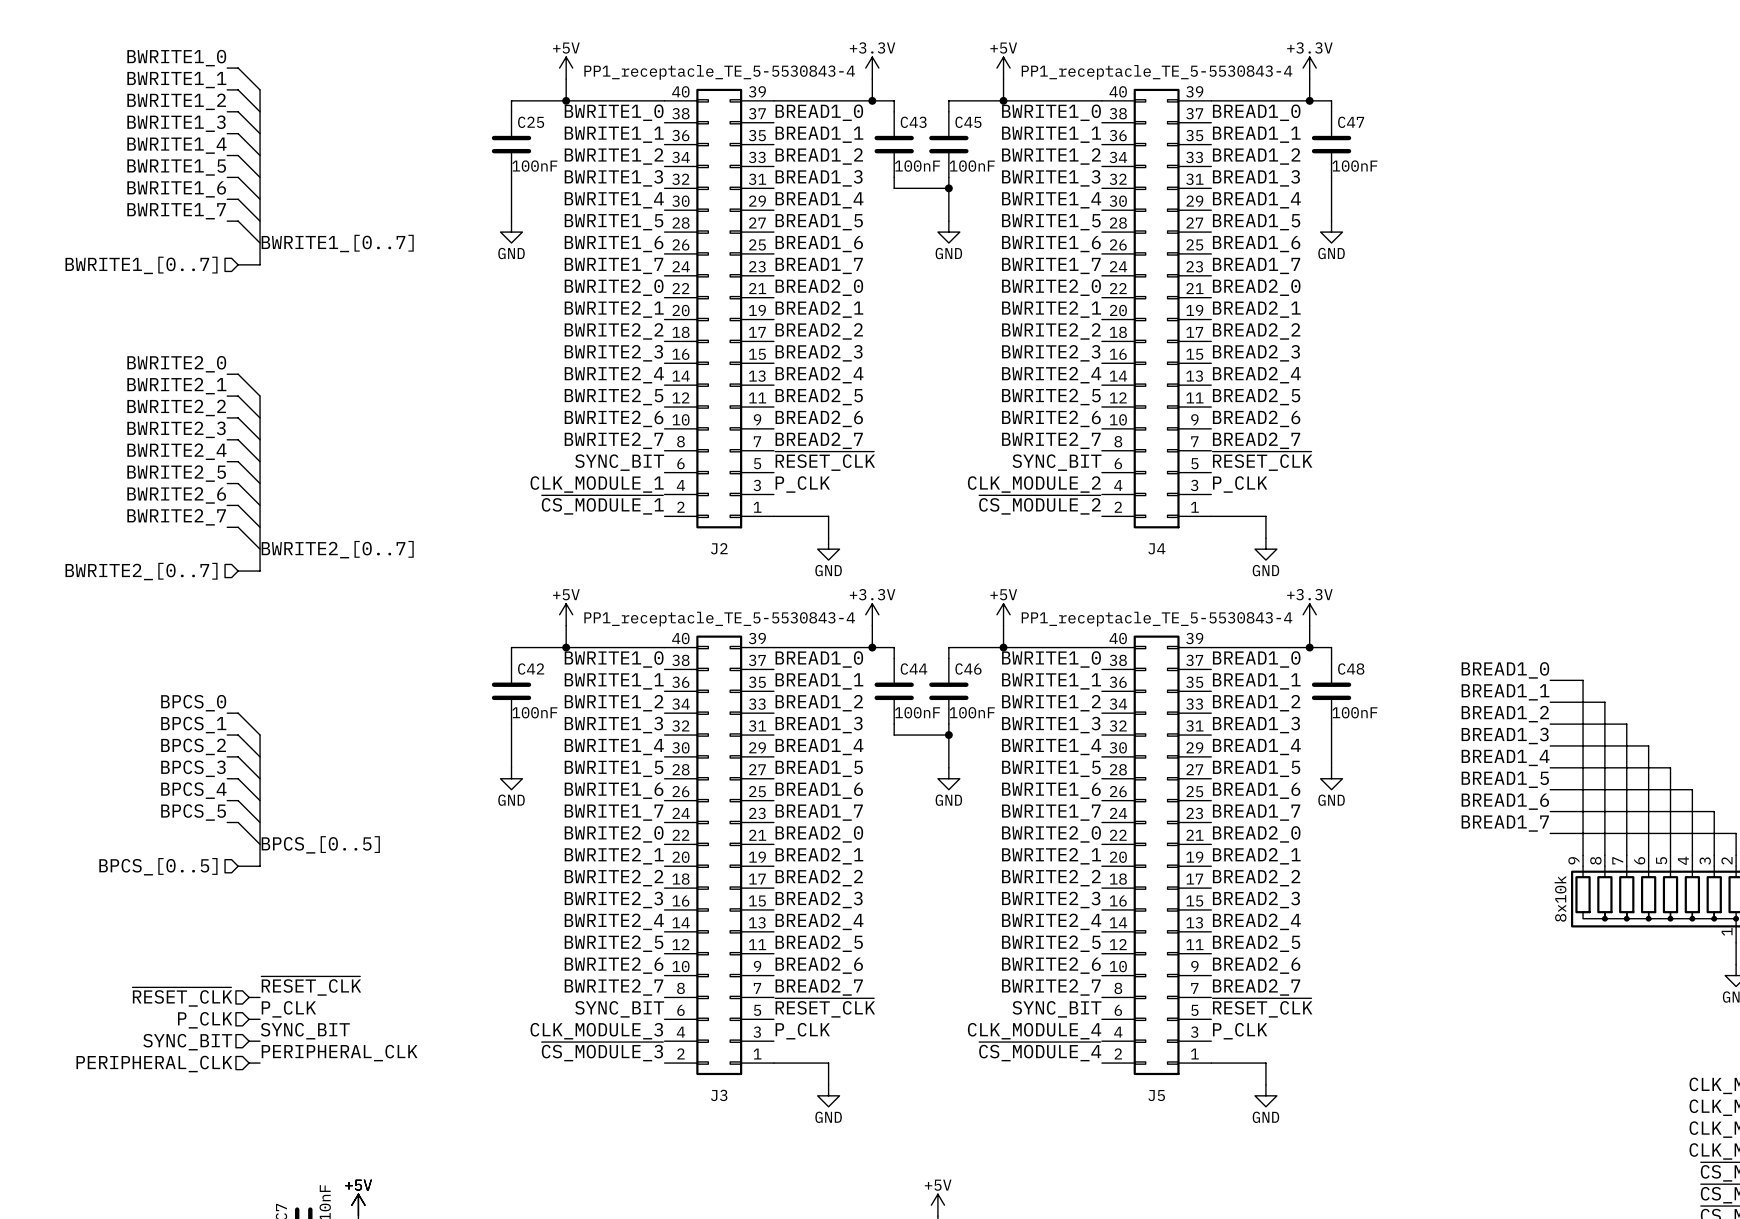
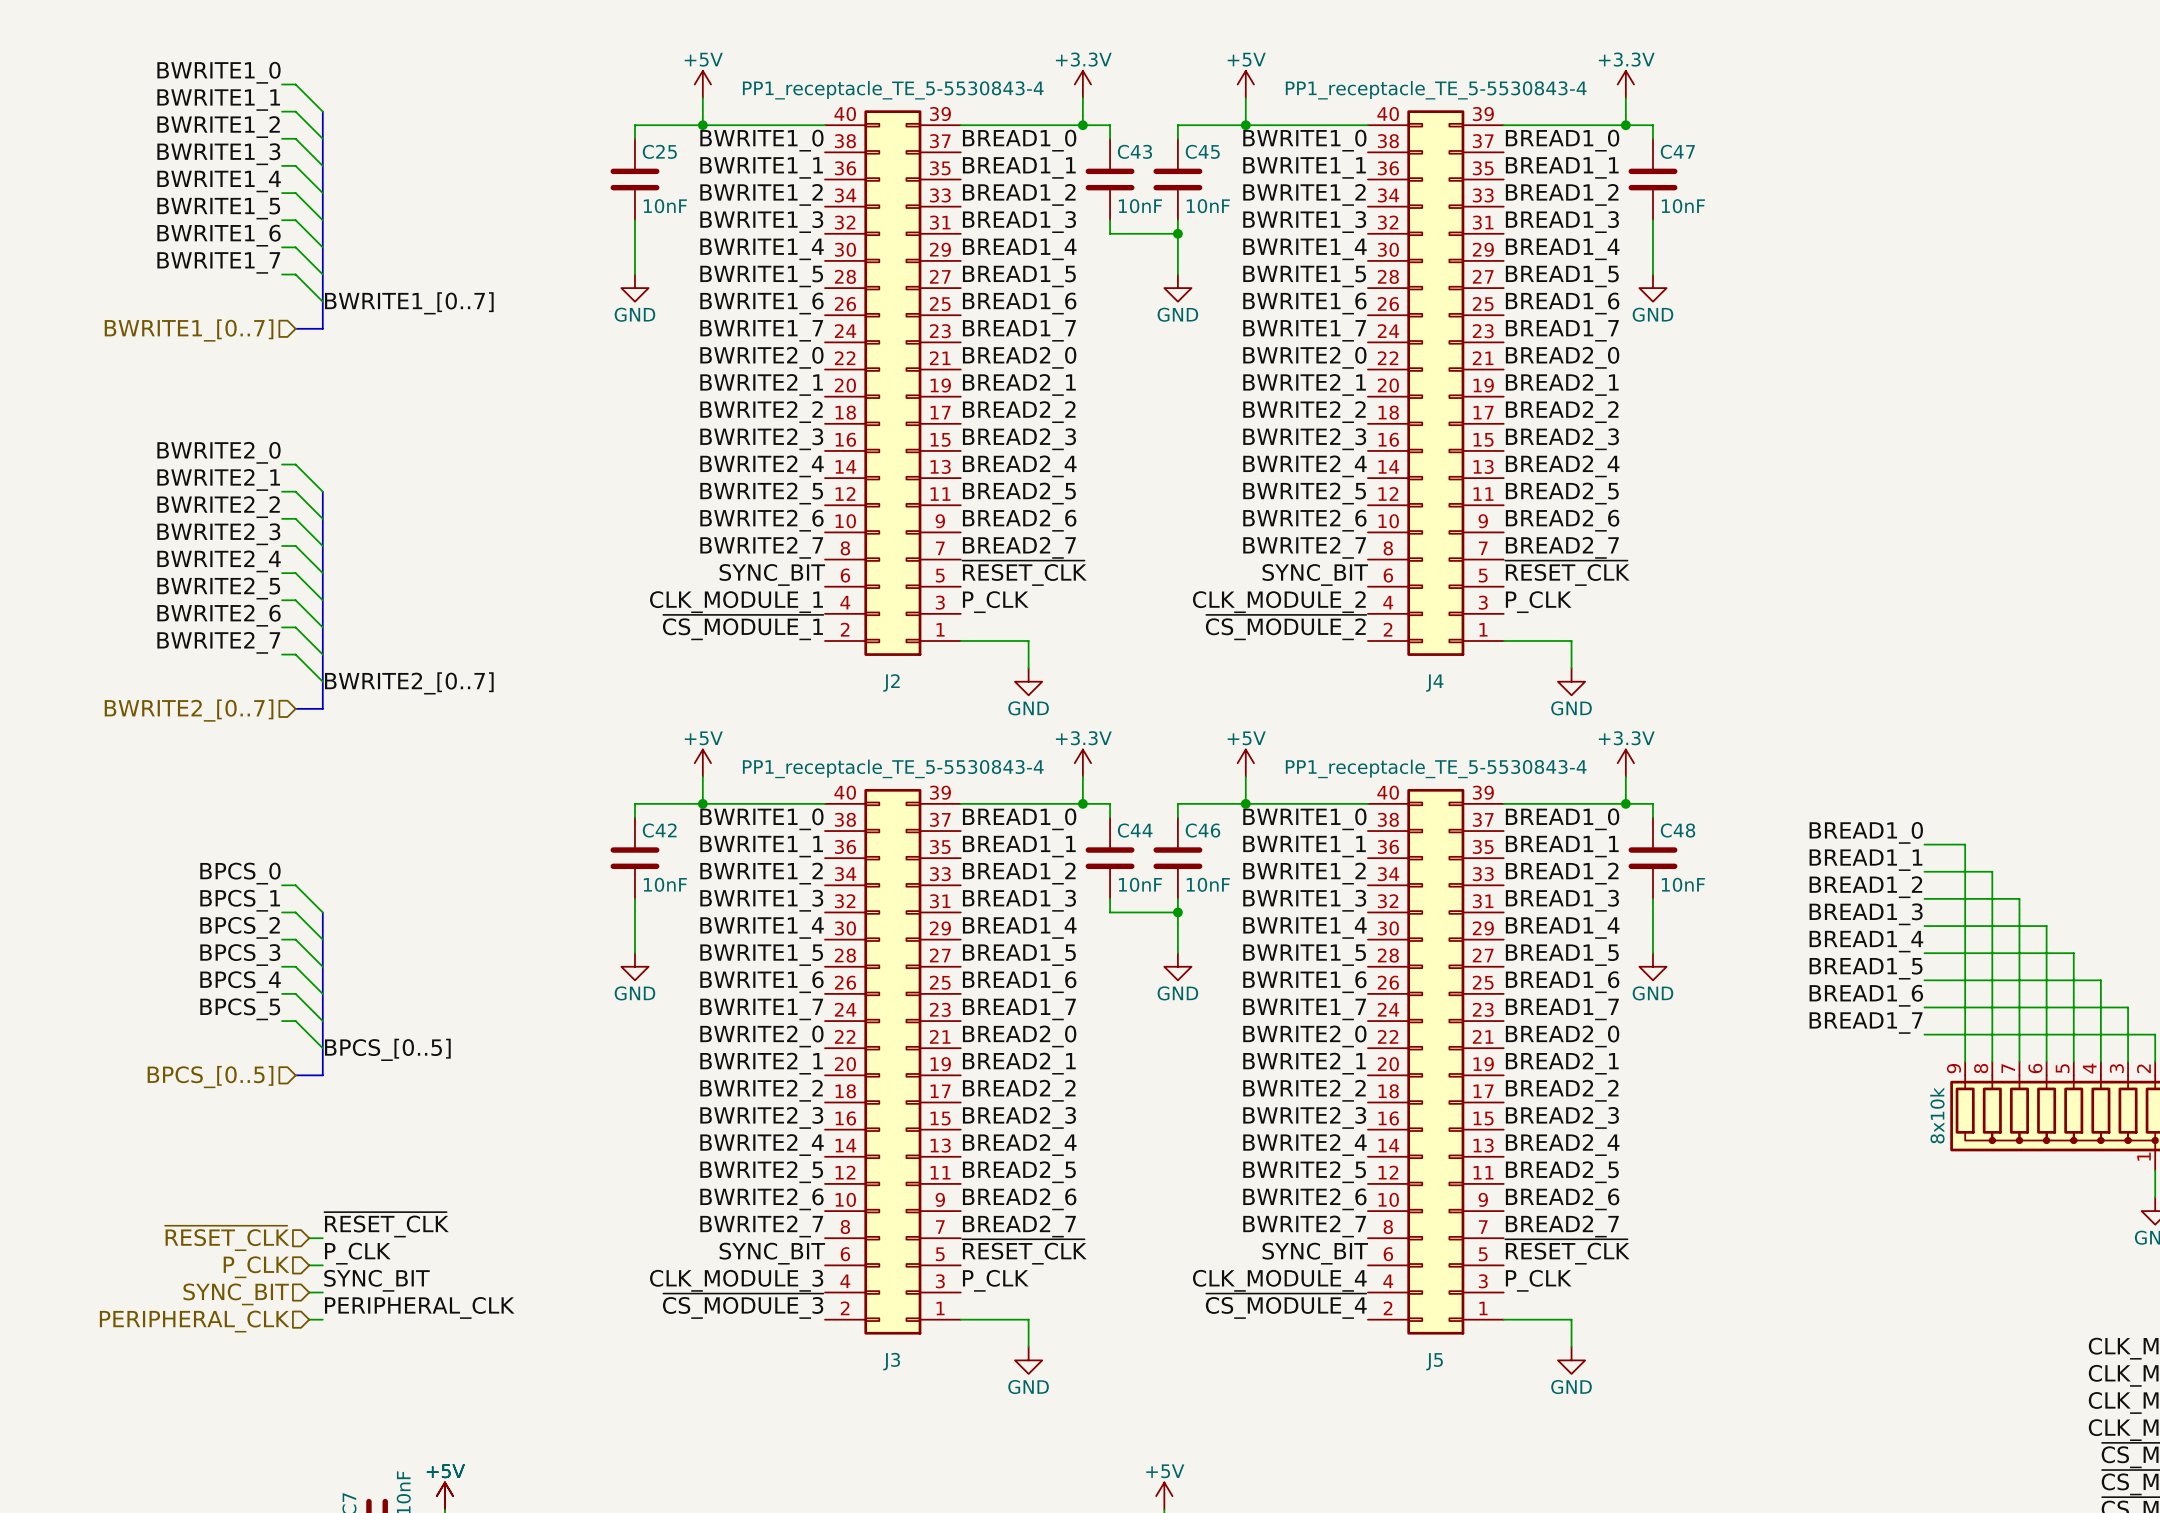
C25 value: 100nF (534, 166) -> 10nF (665, 206)
C43 value: 100nF (917, 166) -> 10nF (1140, 206)
C45 value: 100nF (972, 166) -> 10nF (1208, 206)
C47 value: 100nF (1354, 166) -> 10nF (1683, 206)
C42 value: 100nF (534, 712) -> 10nF (665, 884)
C44 value: 100nF (917, 712) -> 10nF (1140, 884)
C46 value: 100nF (972, 712) -> 10nF (1208, 884)
C48 value: 100nF (1354, 712) -> 10nF (1683, 884)

